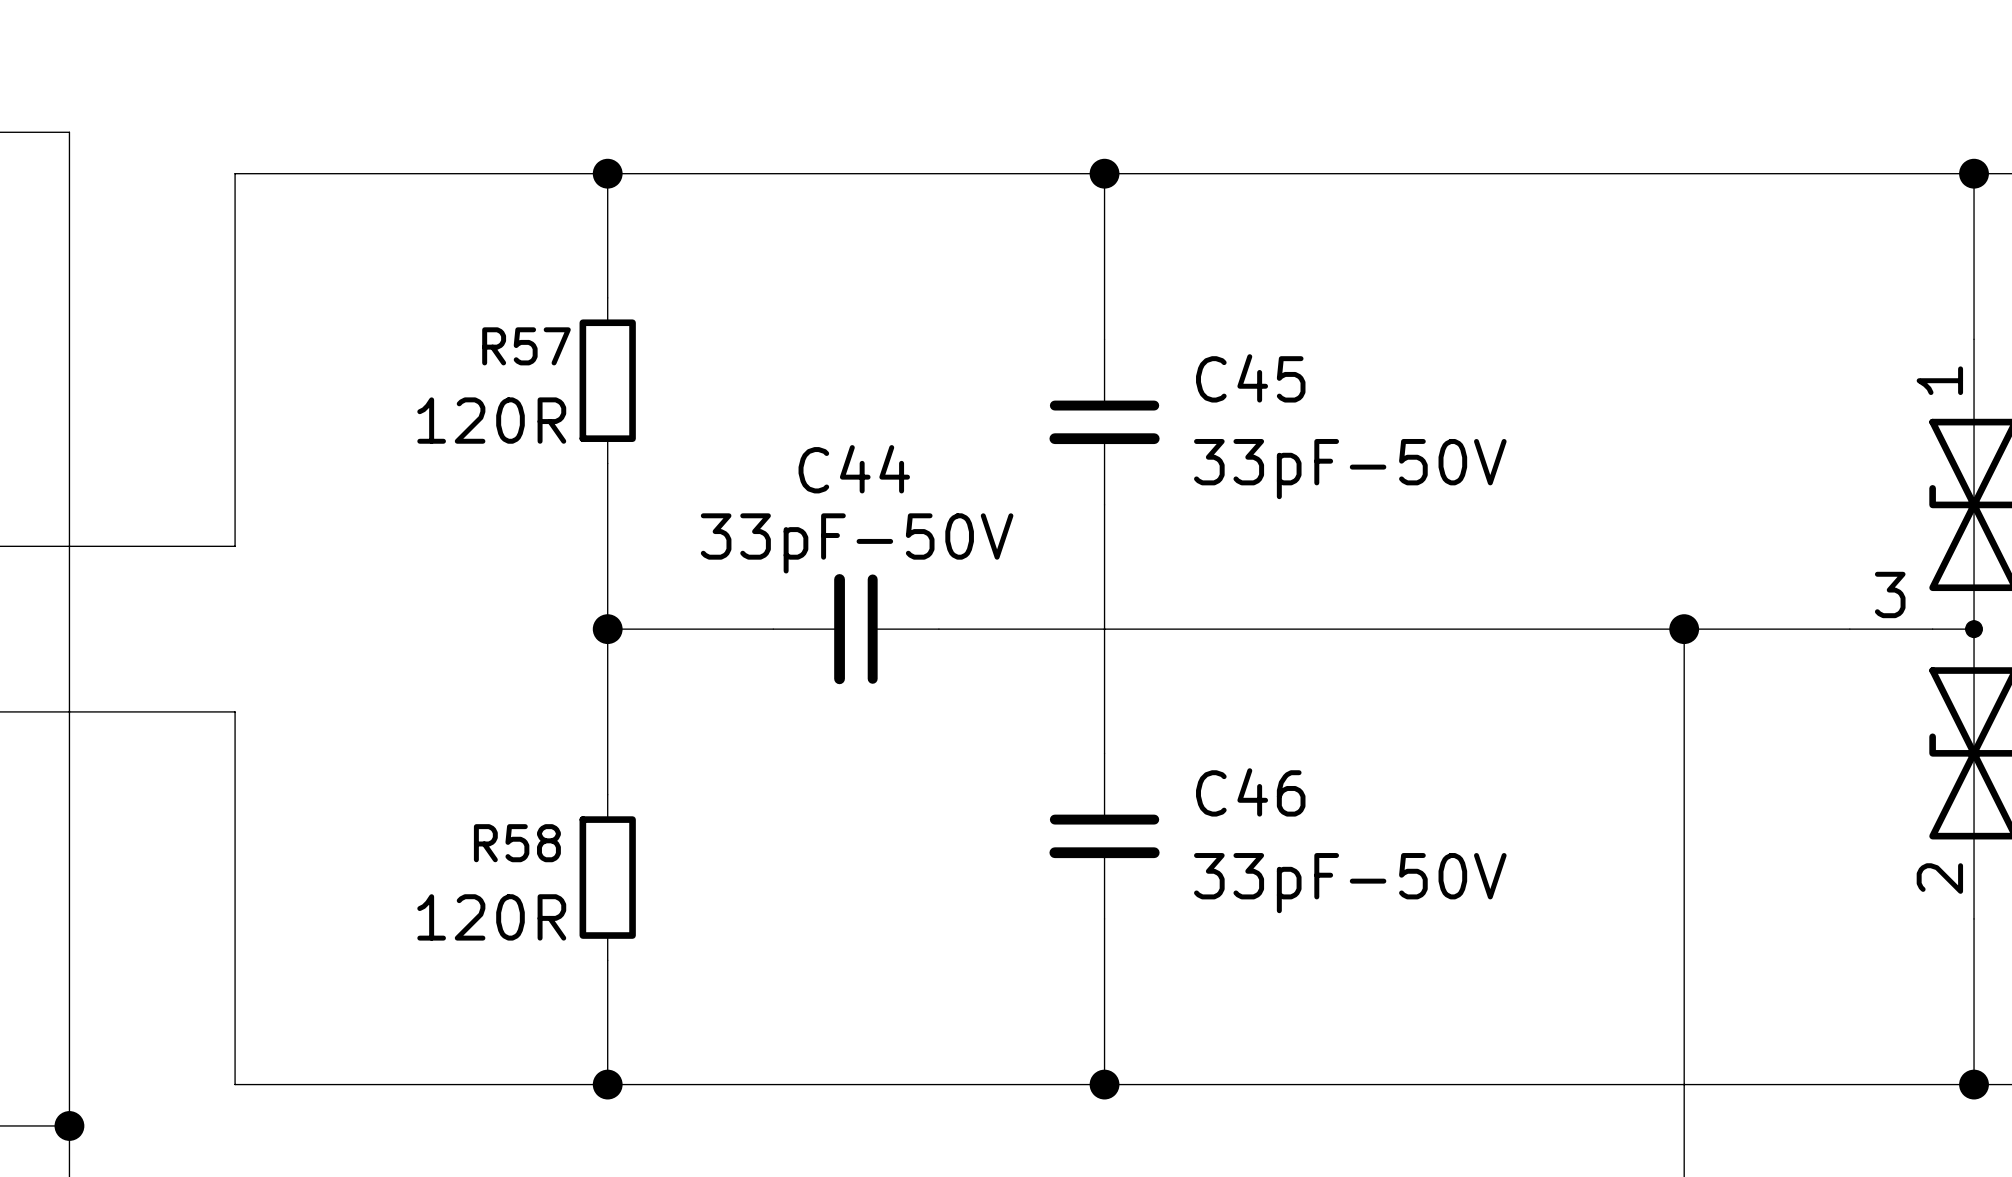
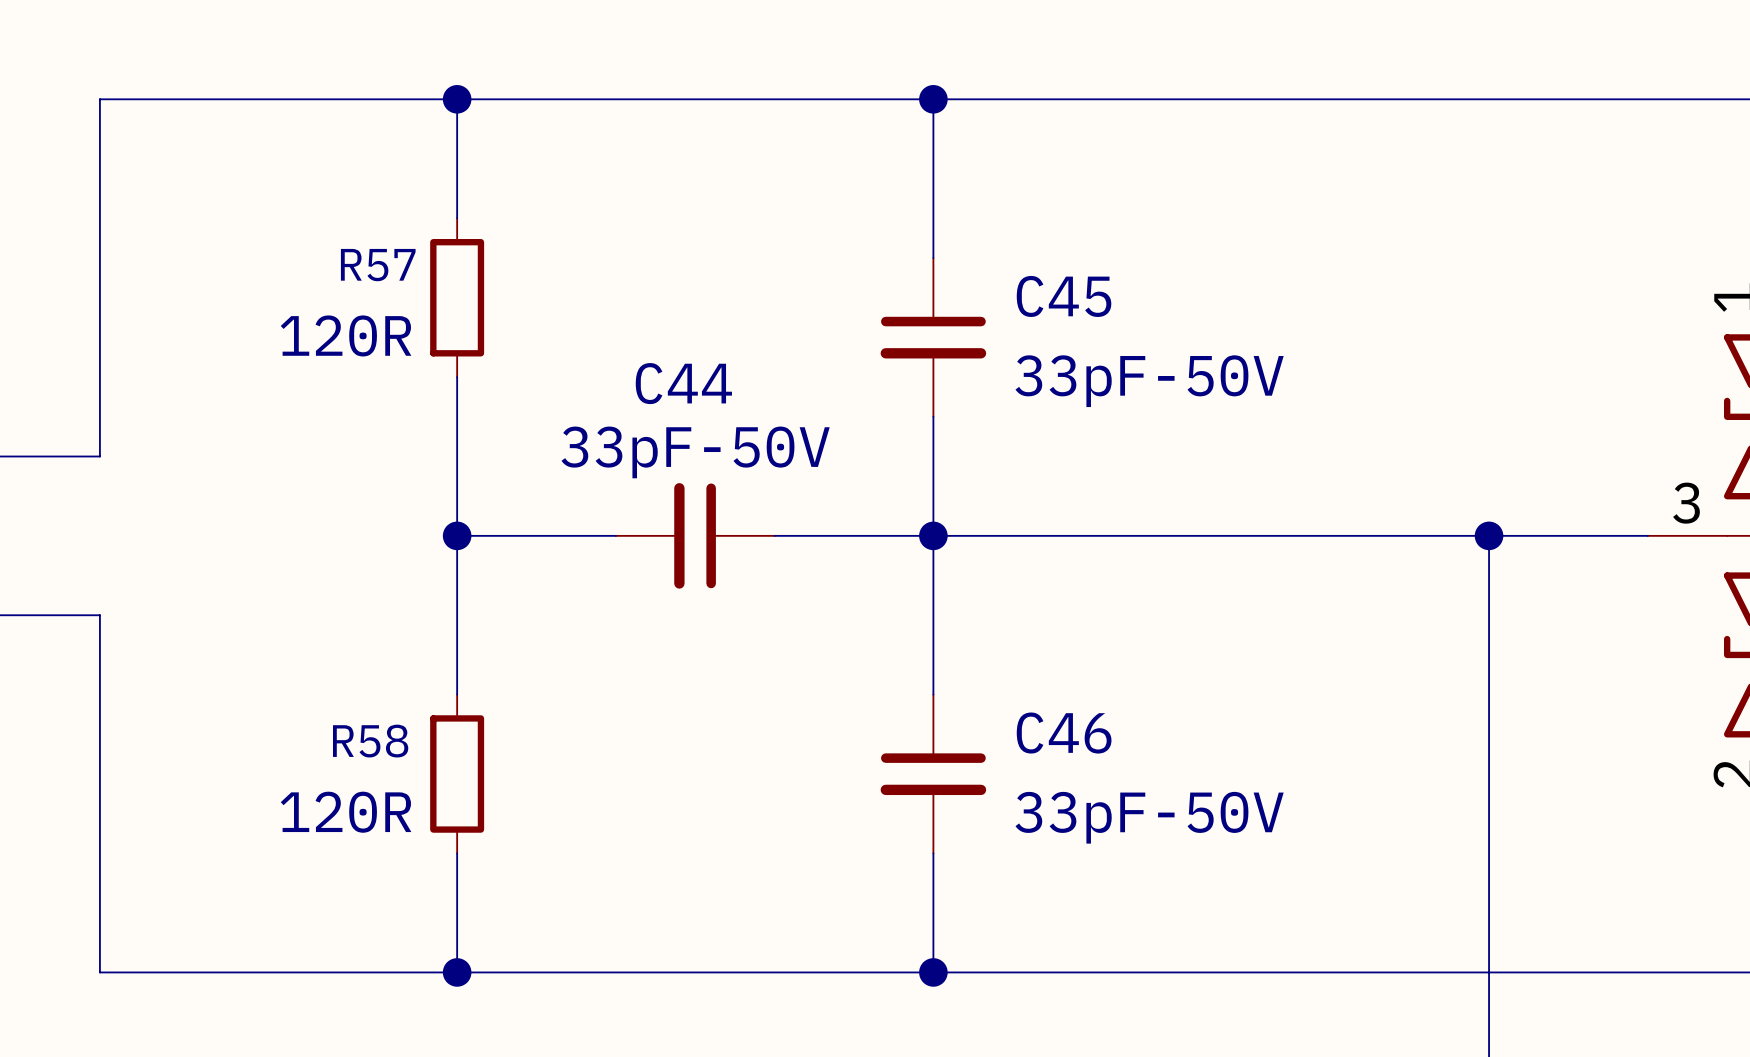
junction: none -> (933, 535)
C46 position: (1104, 836) -> (933, 774)

